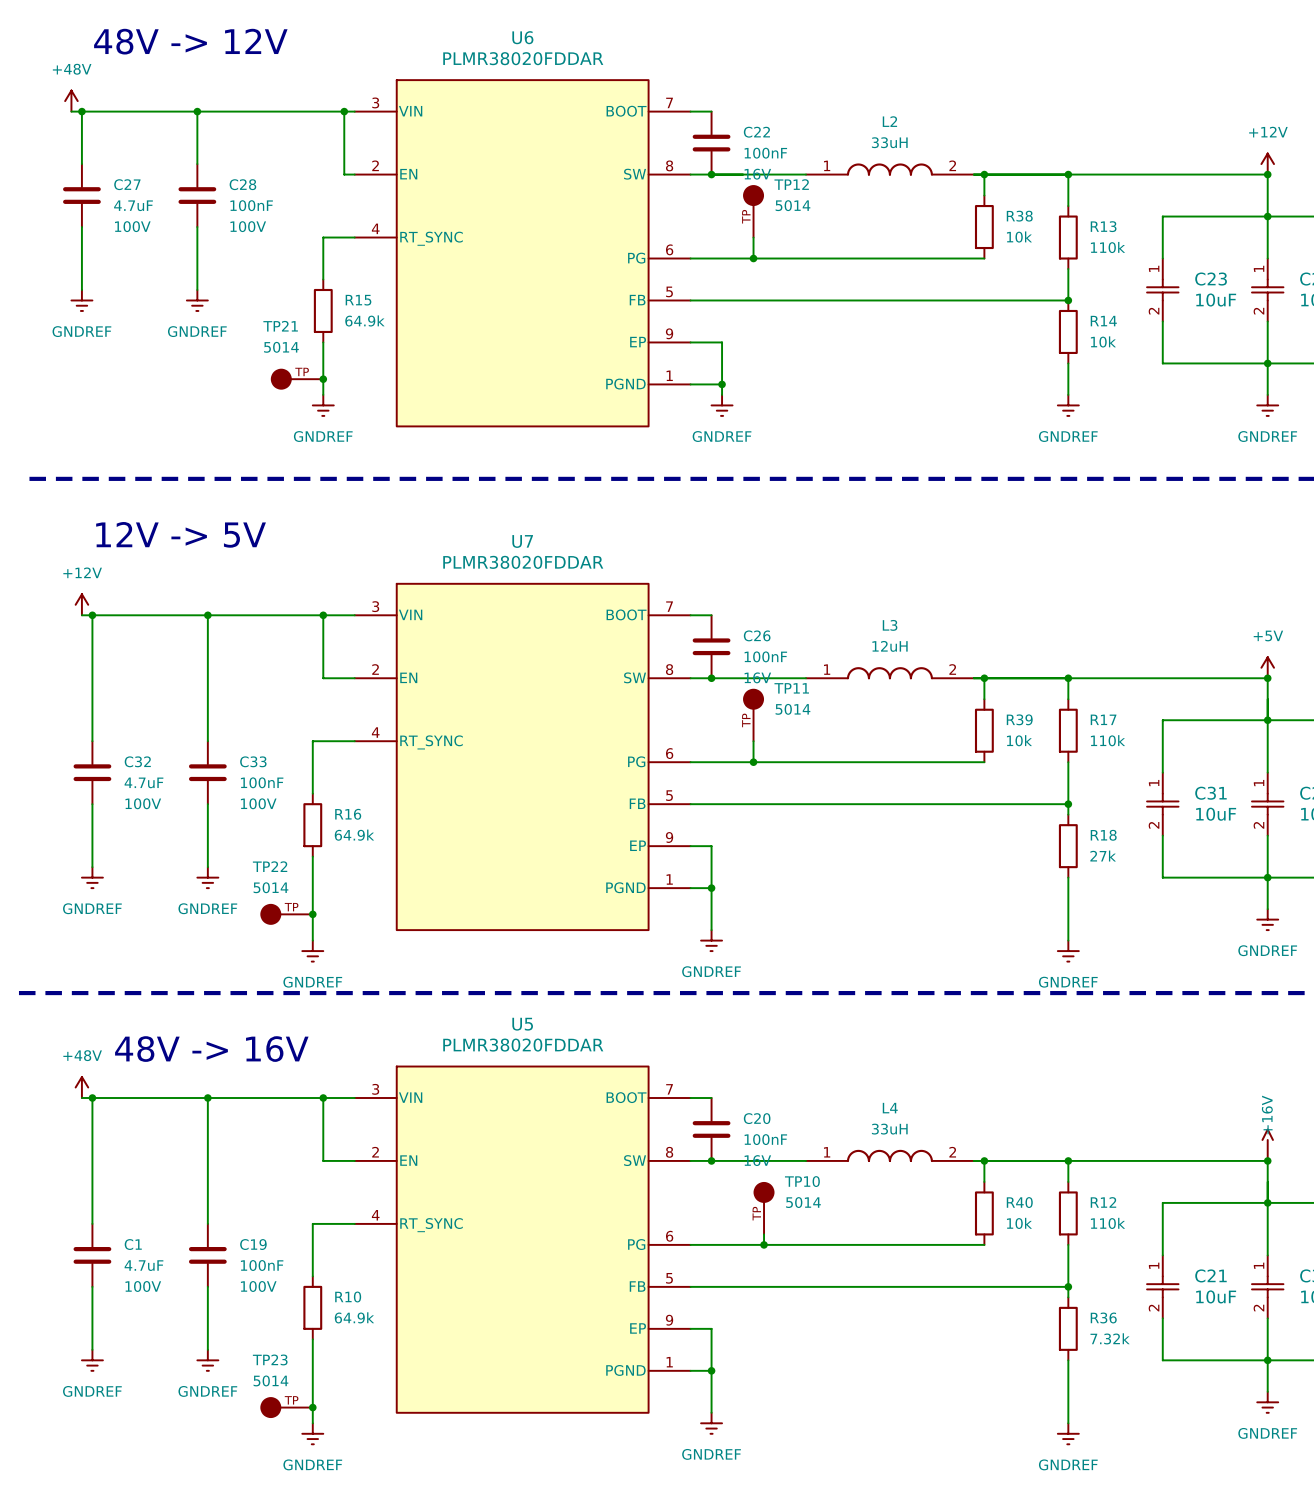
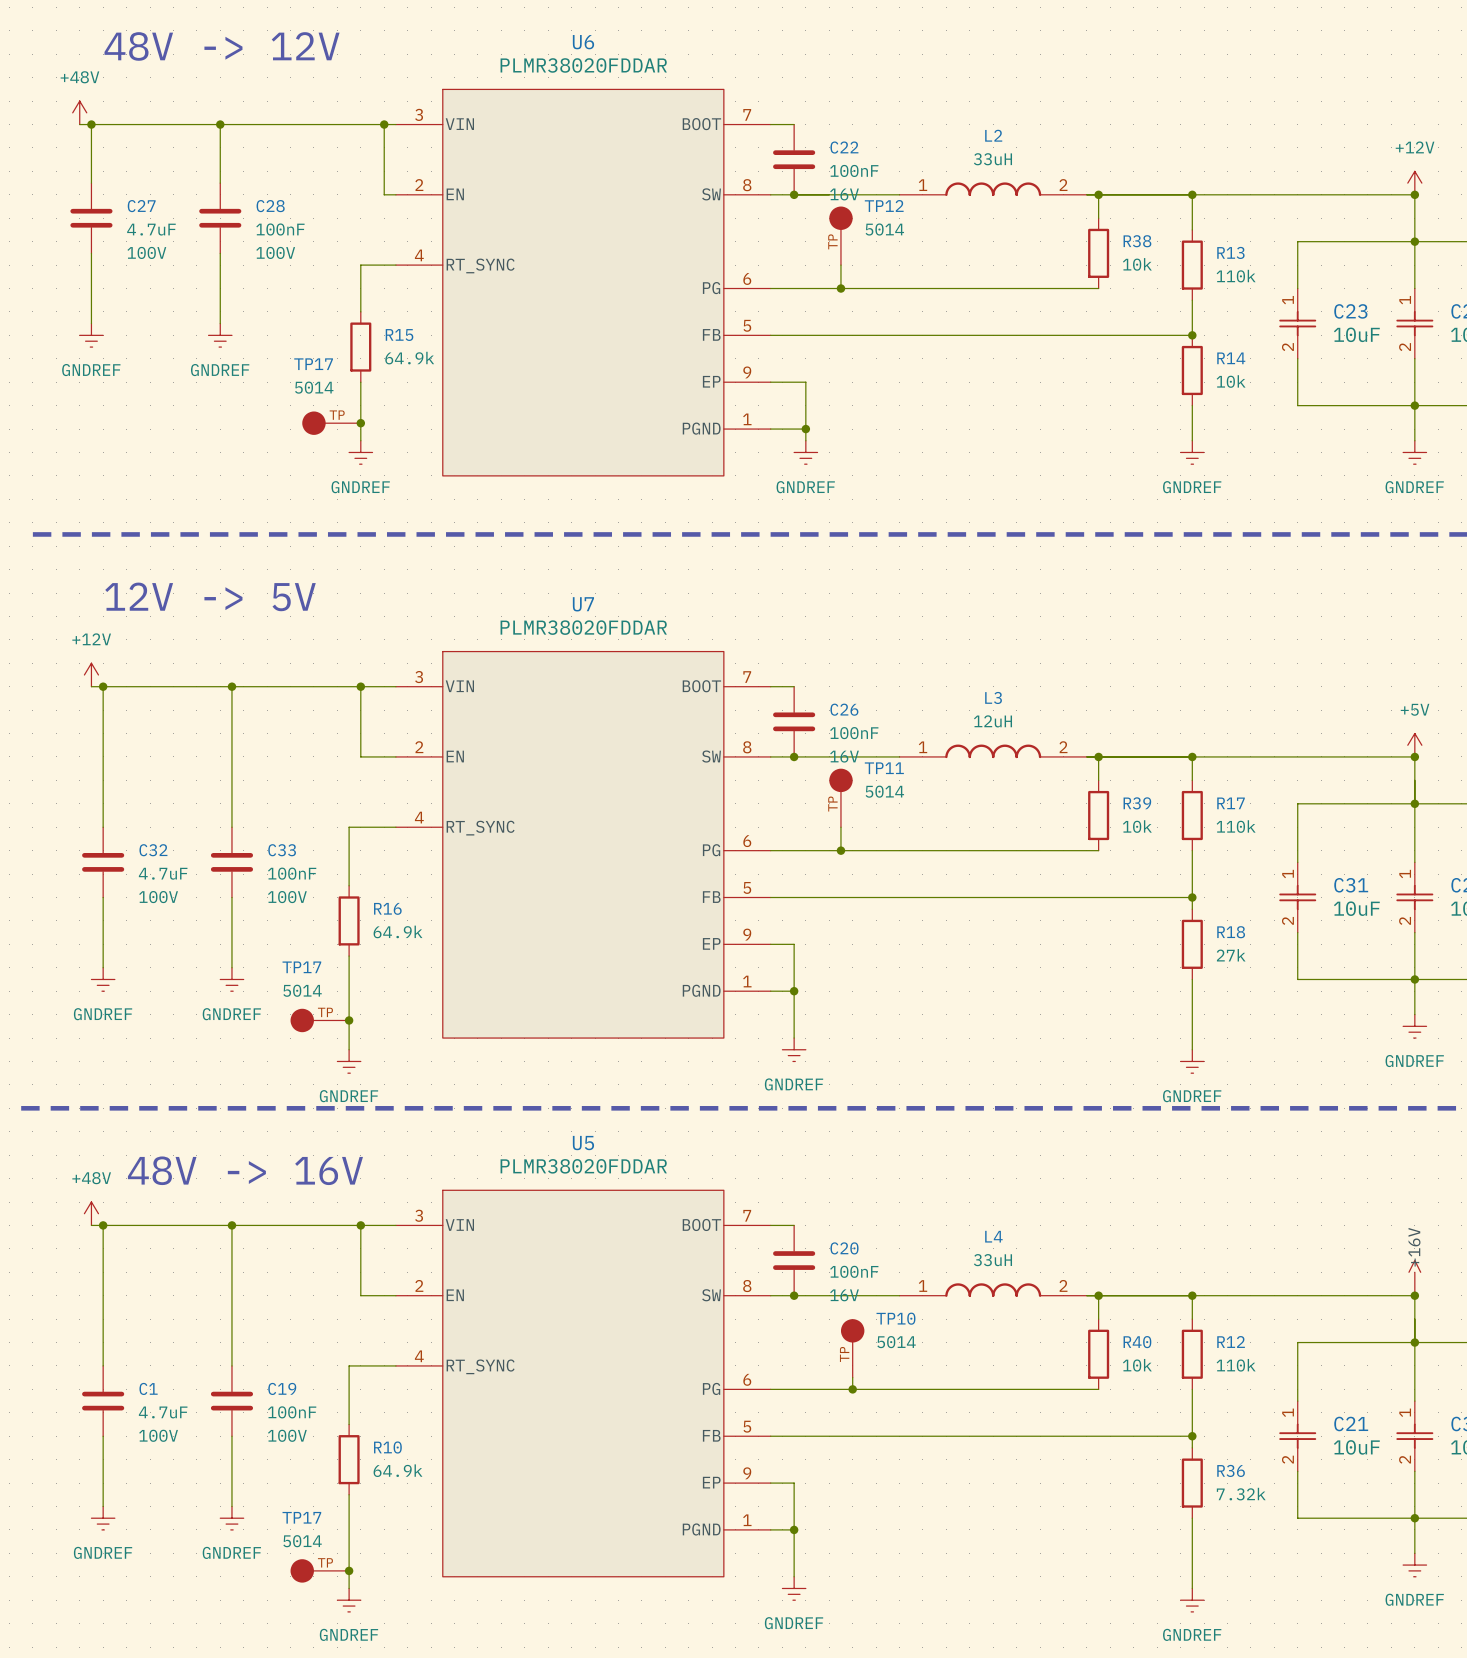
TP21 name: TP21 (280, 326) -> TP17 (313, 364)
TP22 name: TP22 (270, 866) -> TP17 (301, 967)
TP23 name: TP23 (270, 1359) -> TP17 (301, 1517)

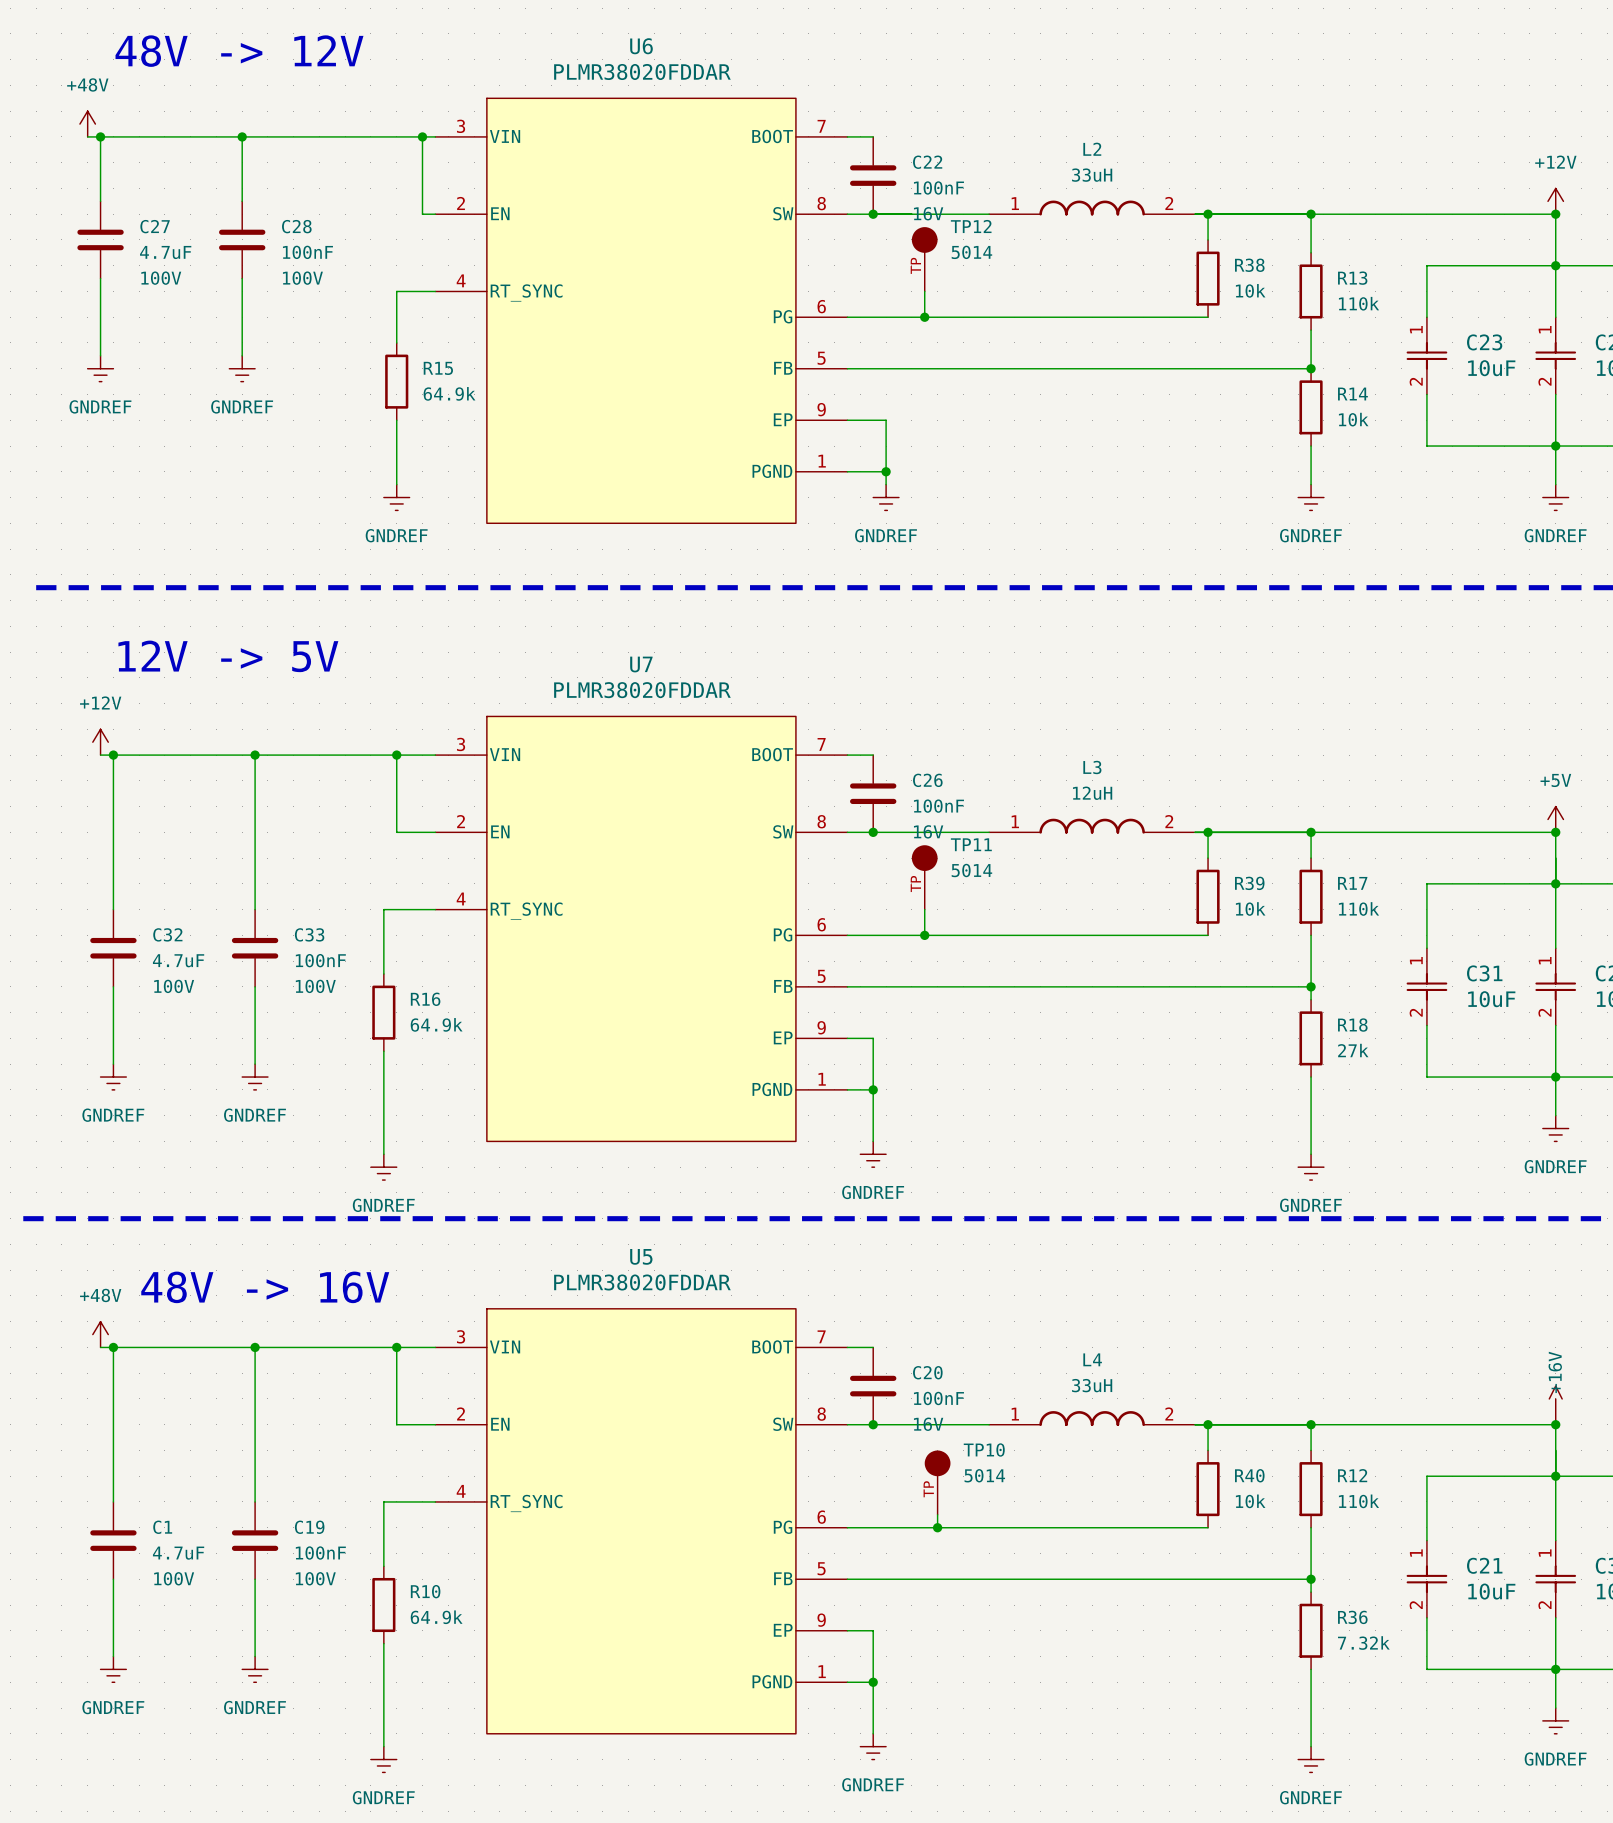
TP17: 5014 (331, 423) -> none
junction: (360, 423) -> none
TP17: 5014 (319, 1020) -> none
junction: (349, 1020) -> none
TP17: 5014 (319, 1570) -> none
junction: (349, 1570) -> none

